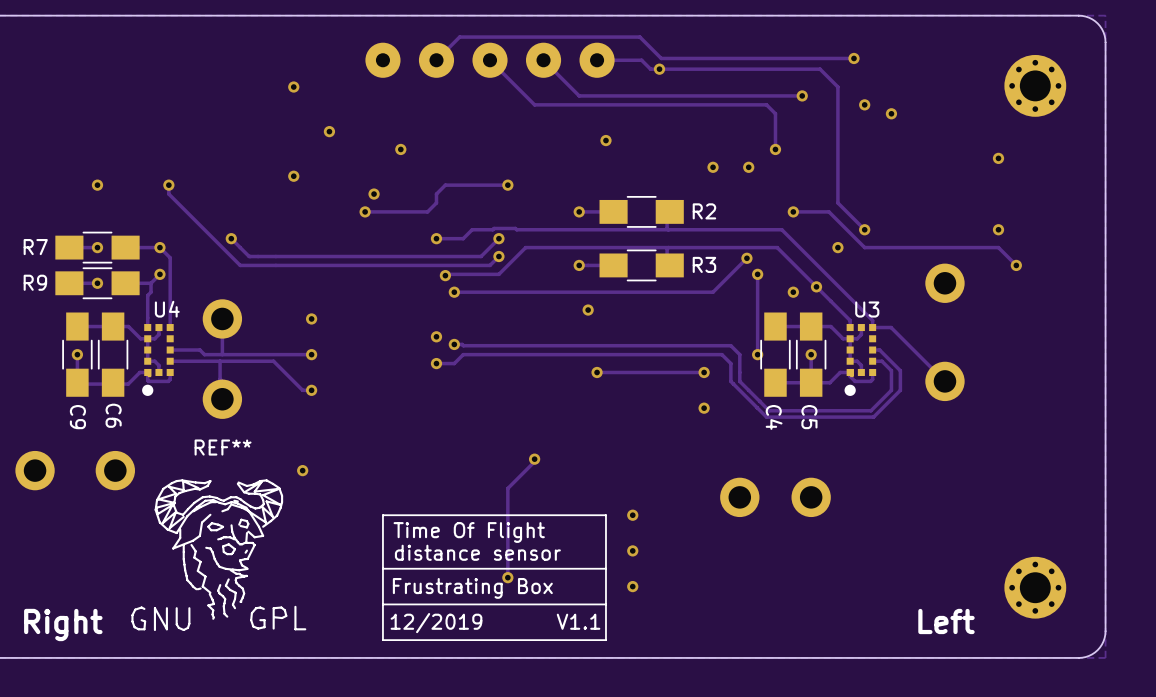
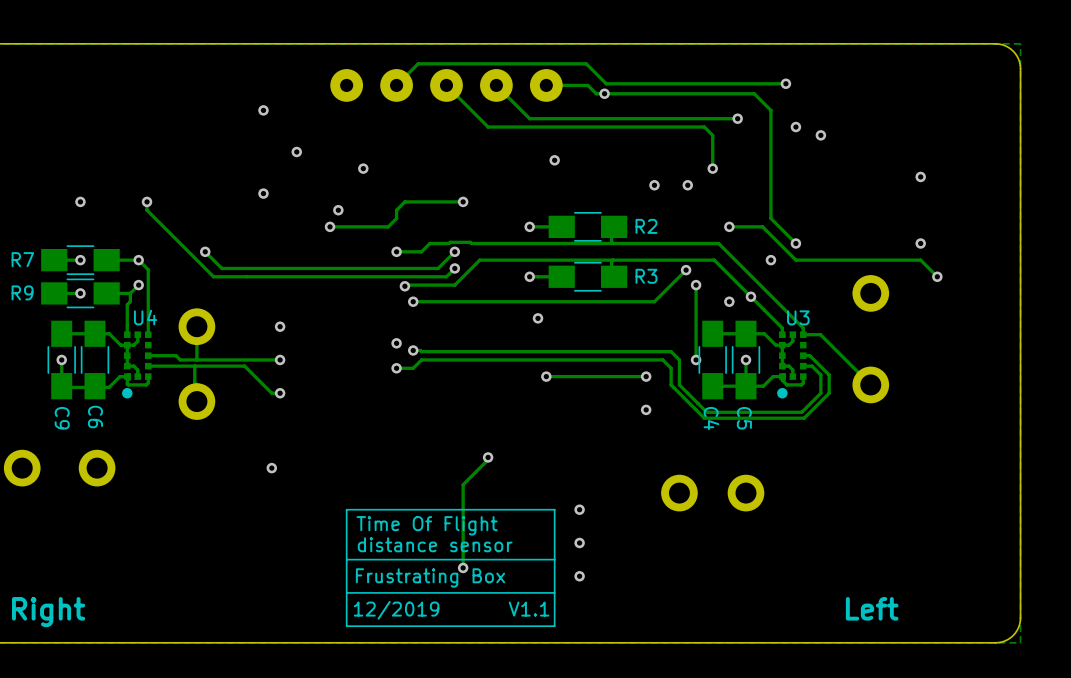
part: (1035, 85) -> none
REF**: (218, 555) -> none
part: (1035, 587) -> none

